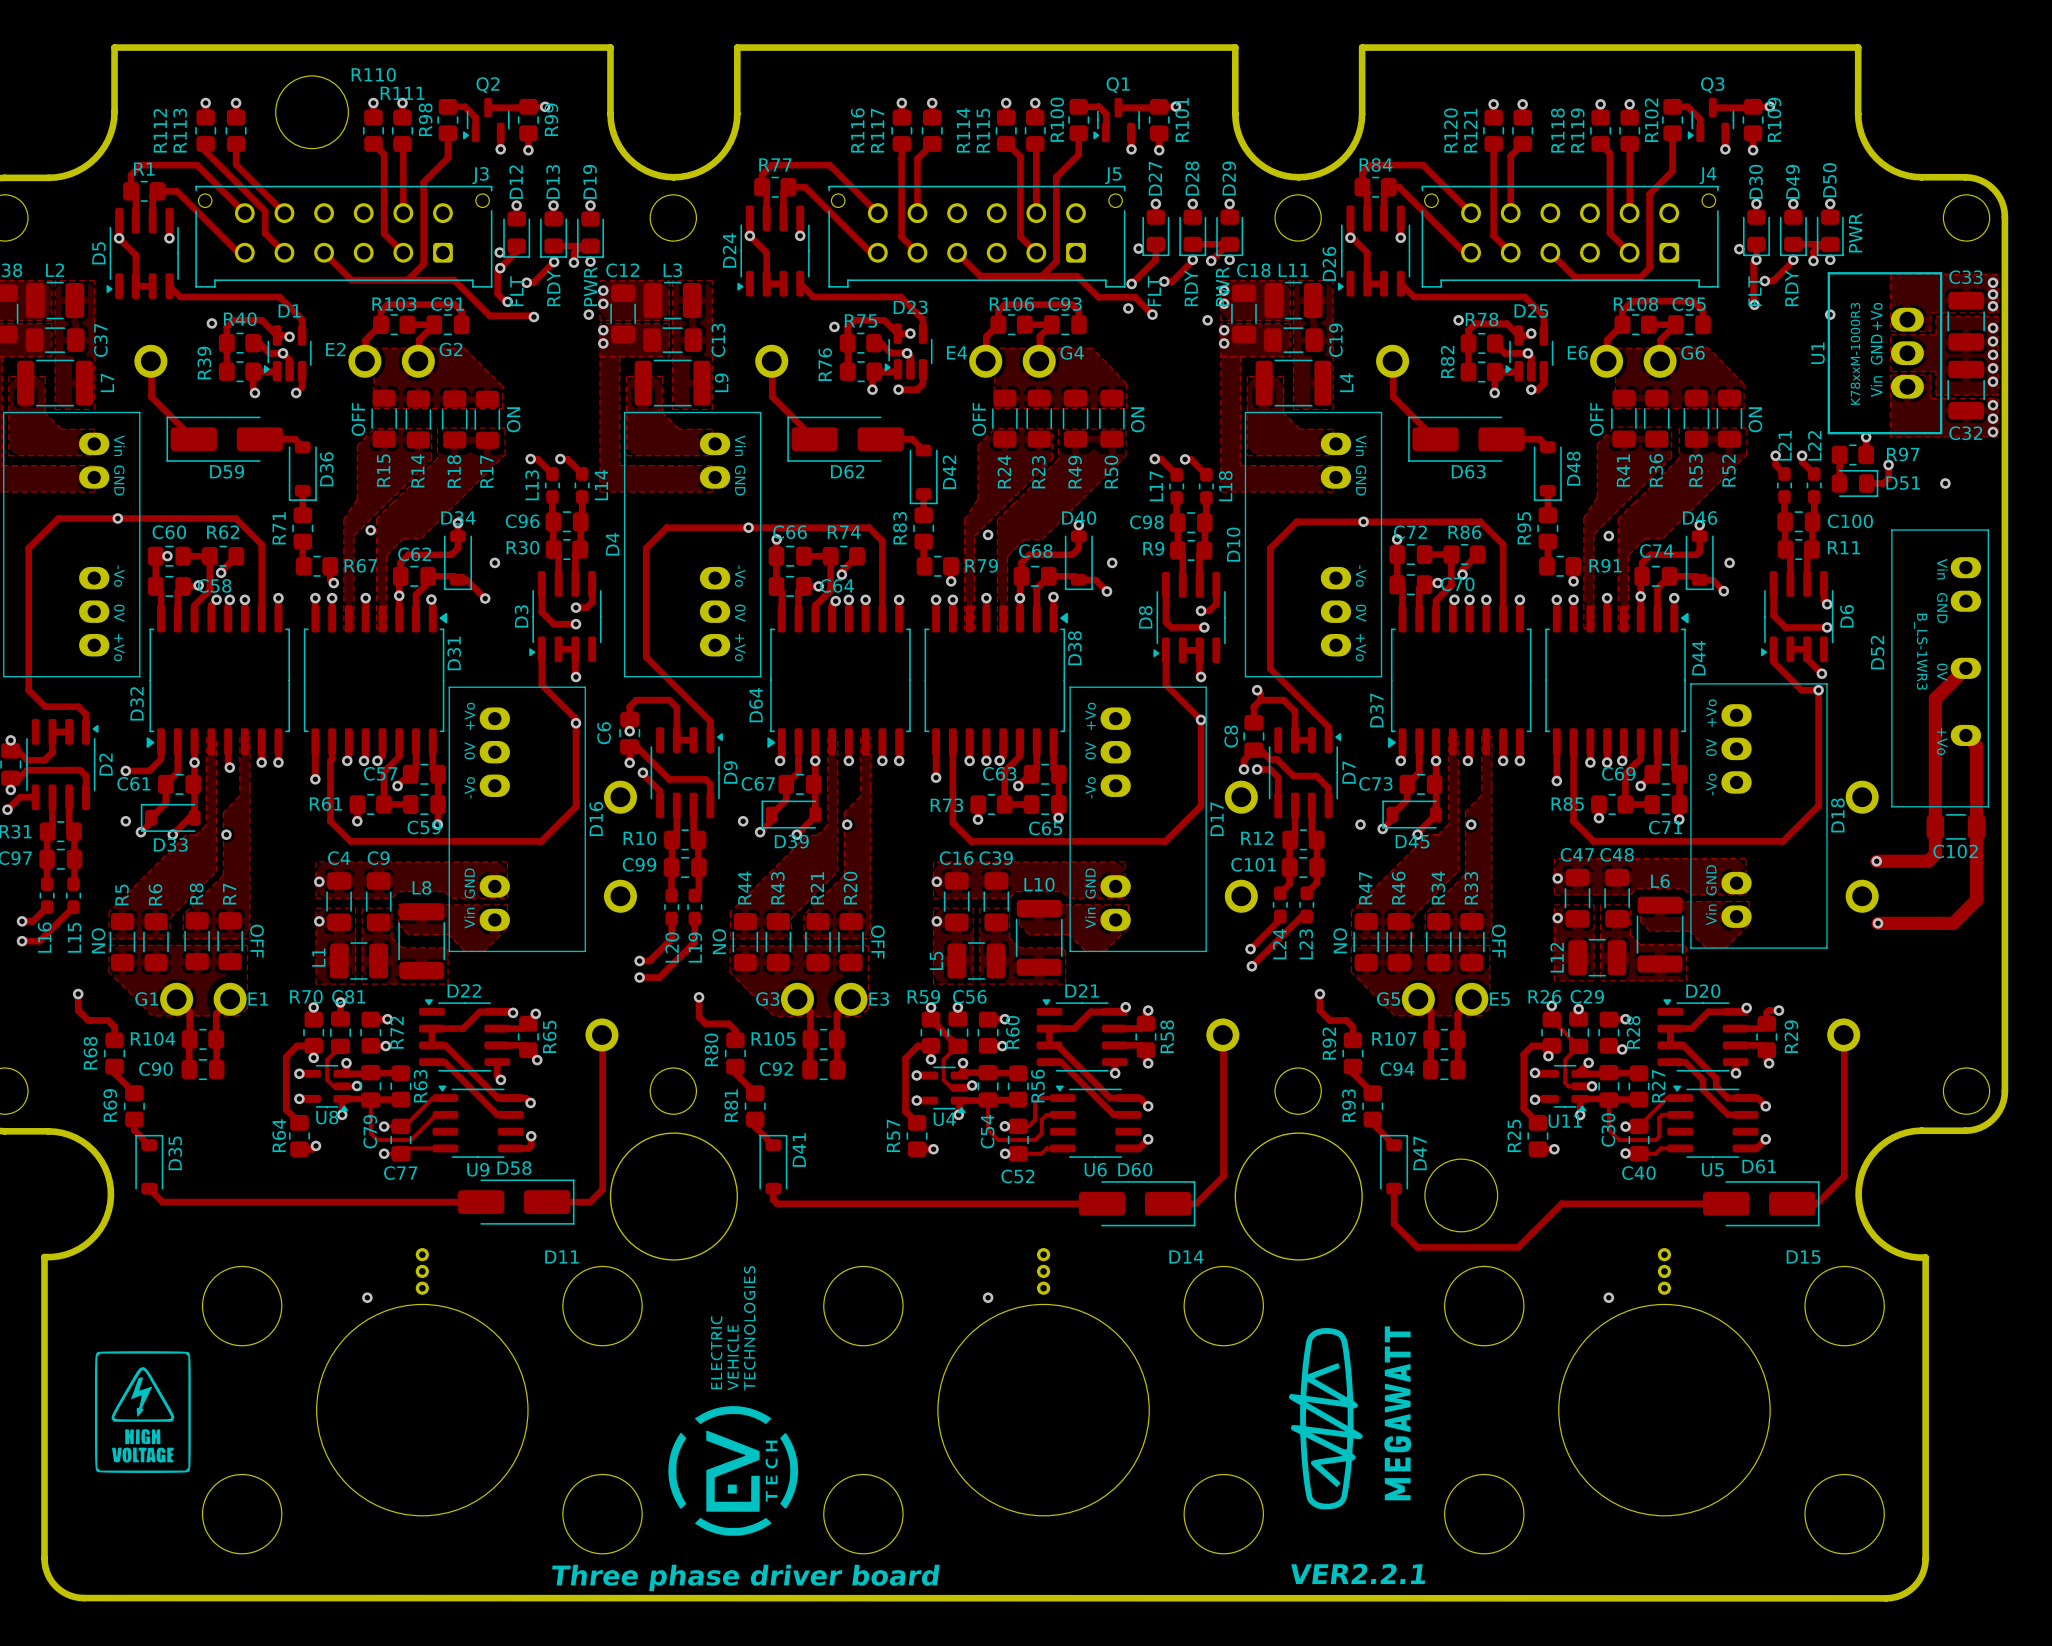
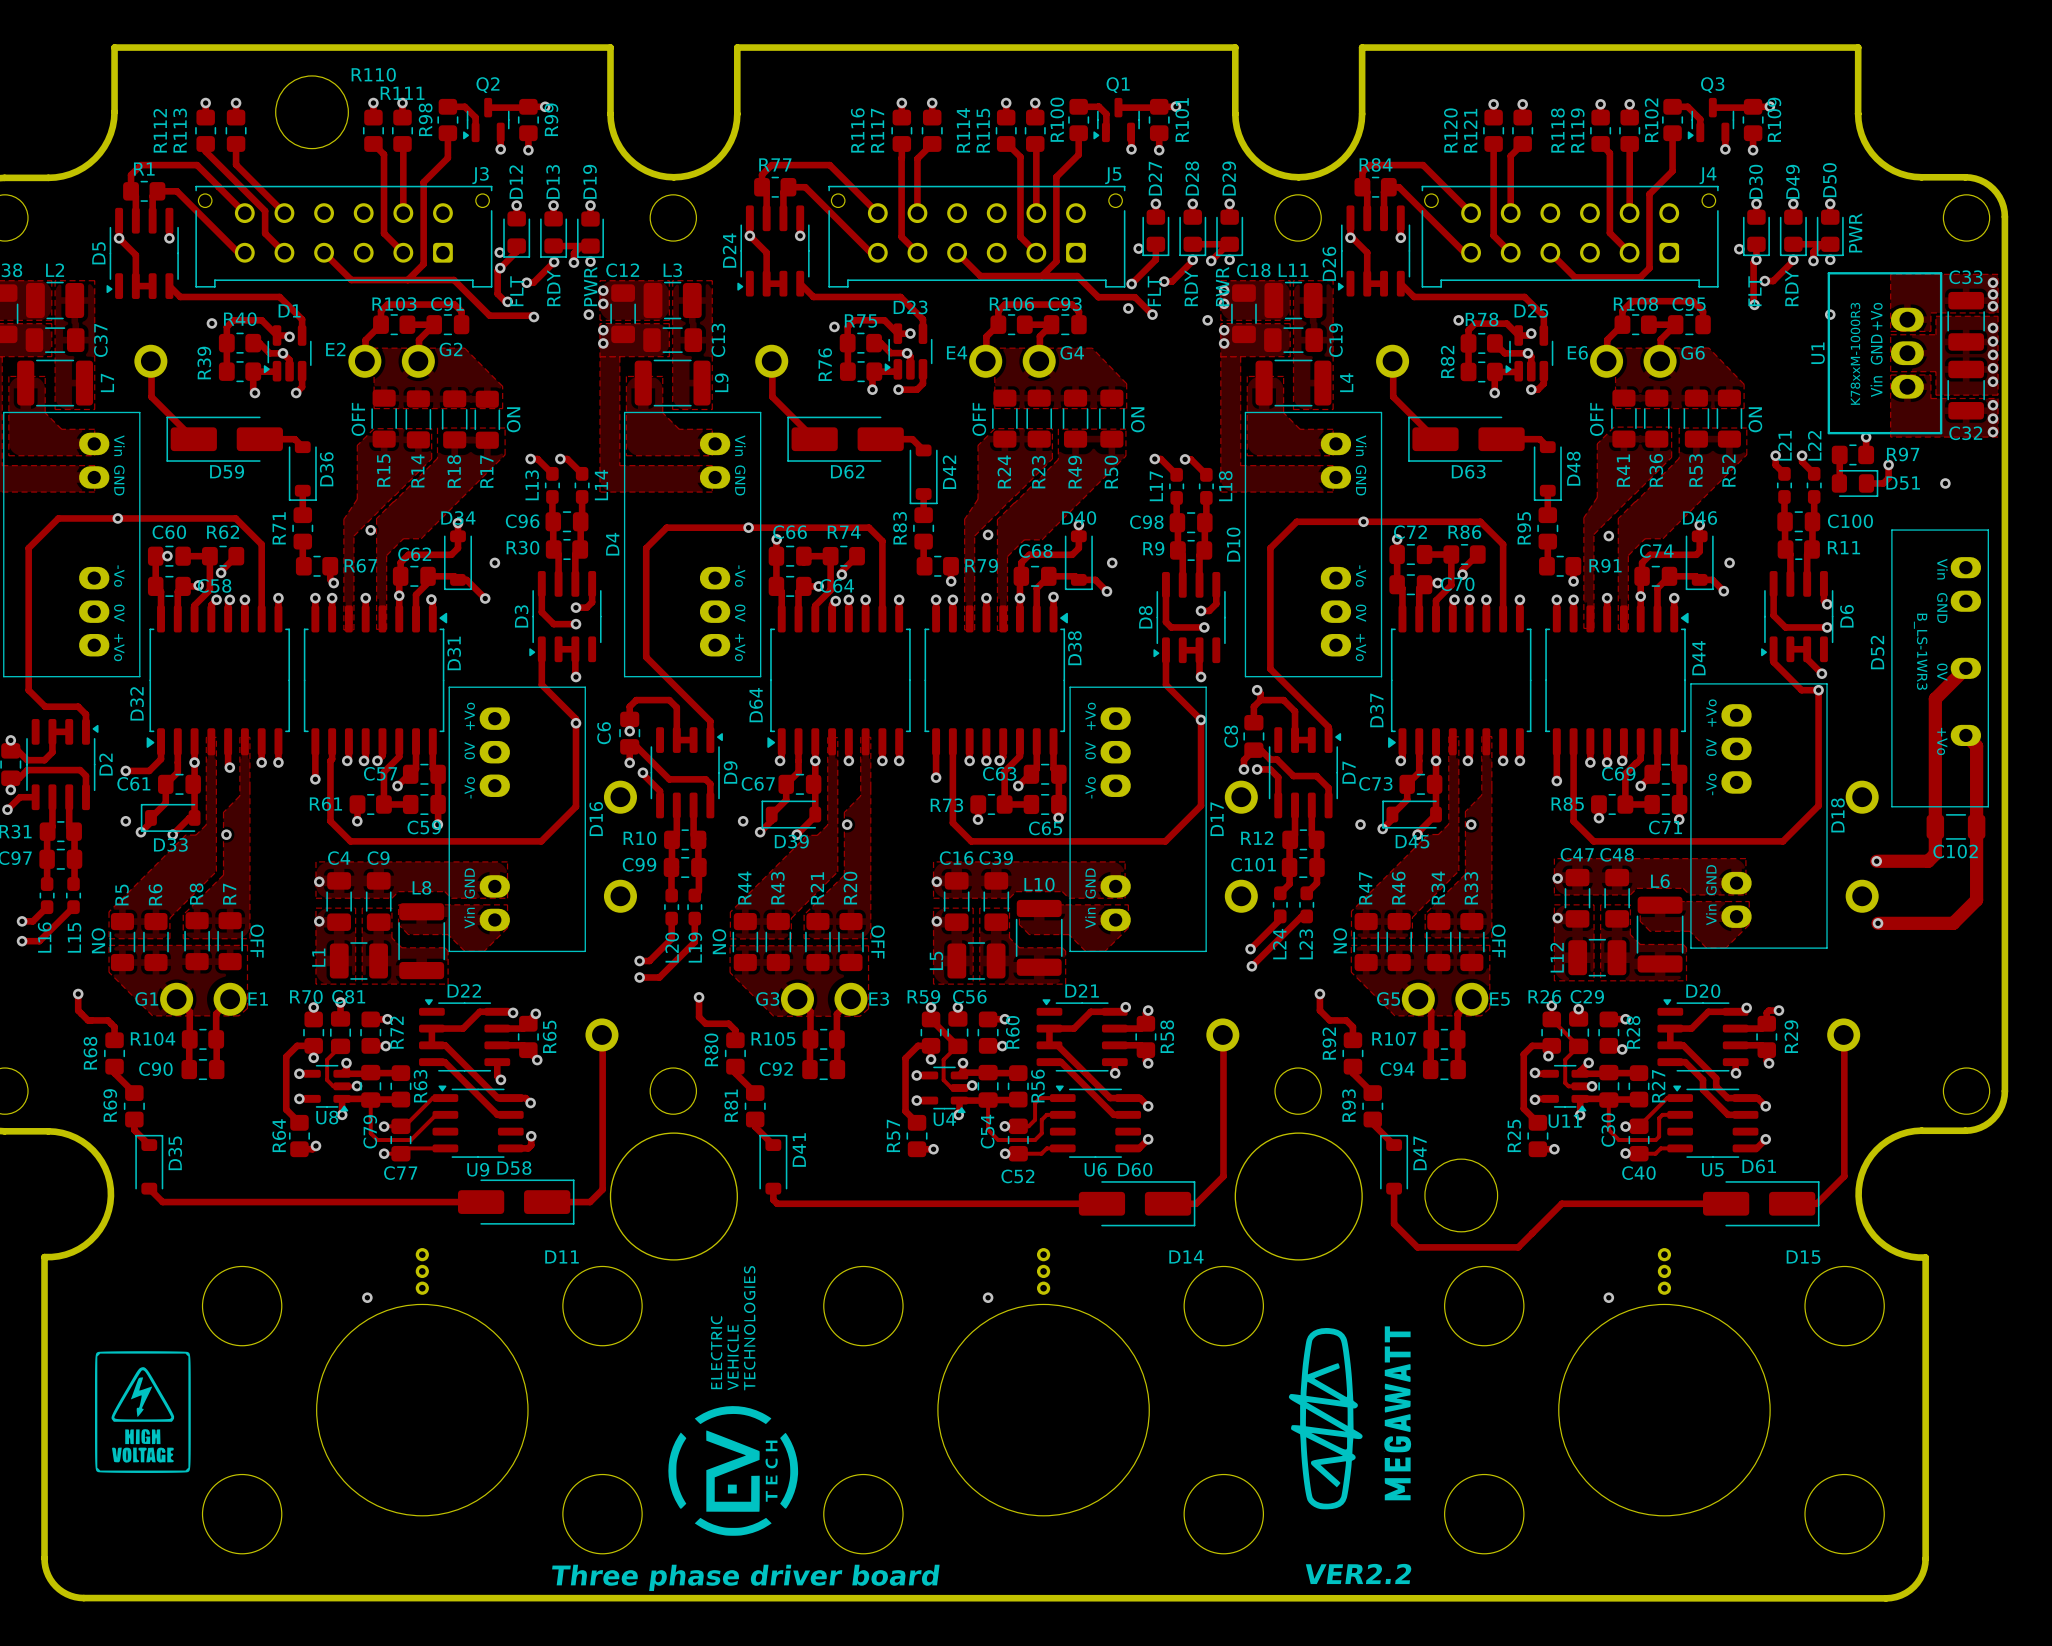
text: VER2.2.1 (1358, 1573) -> VER2.2 (1358, 1573)

